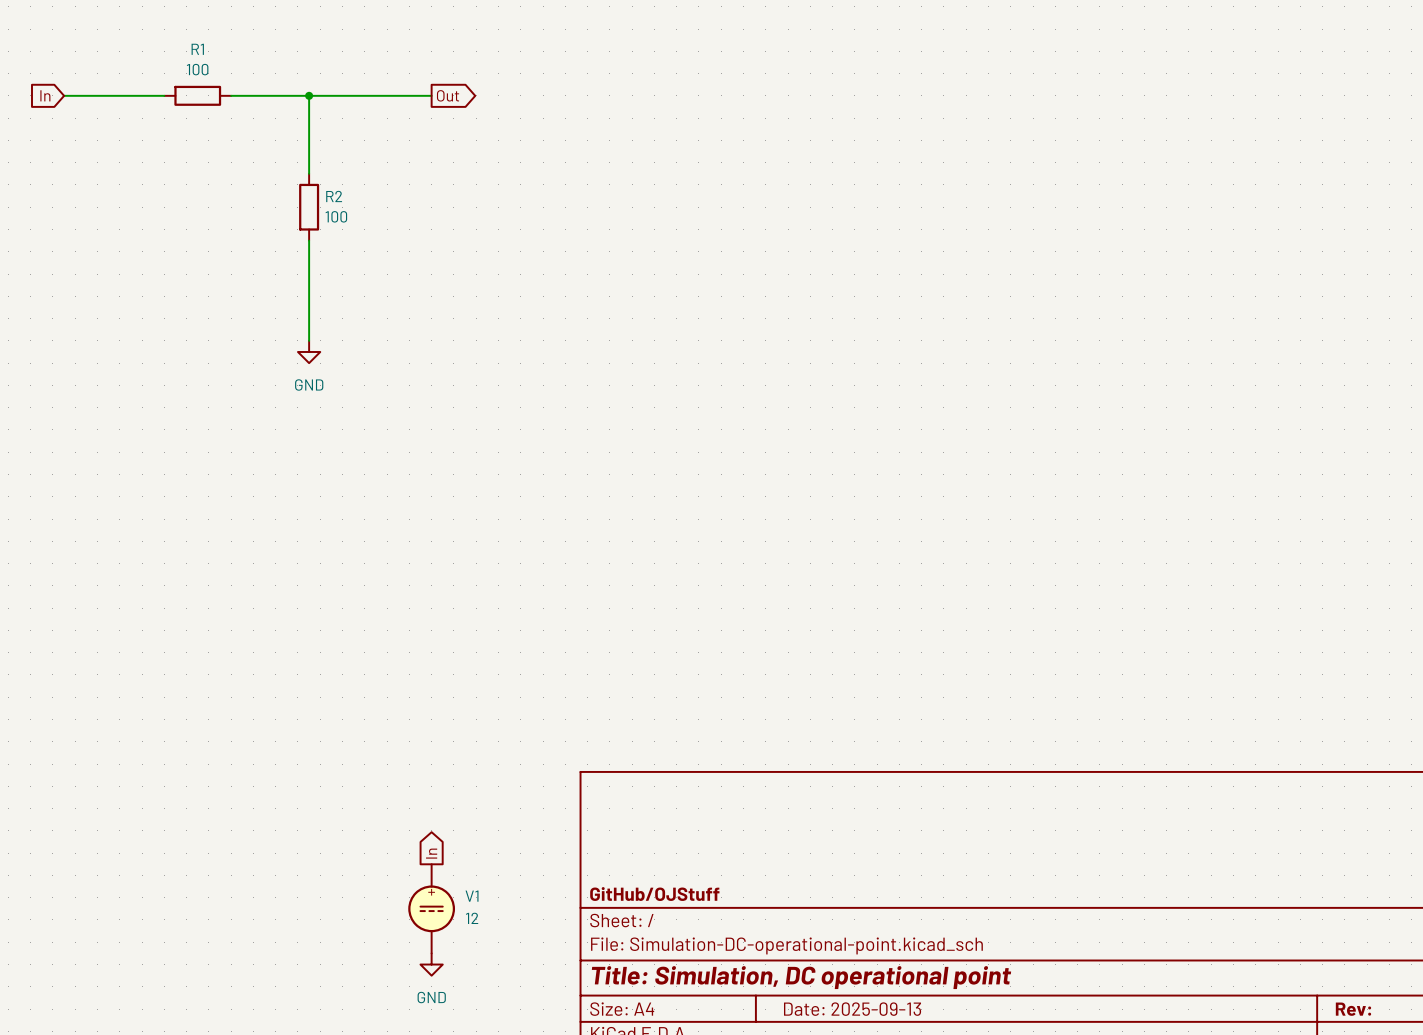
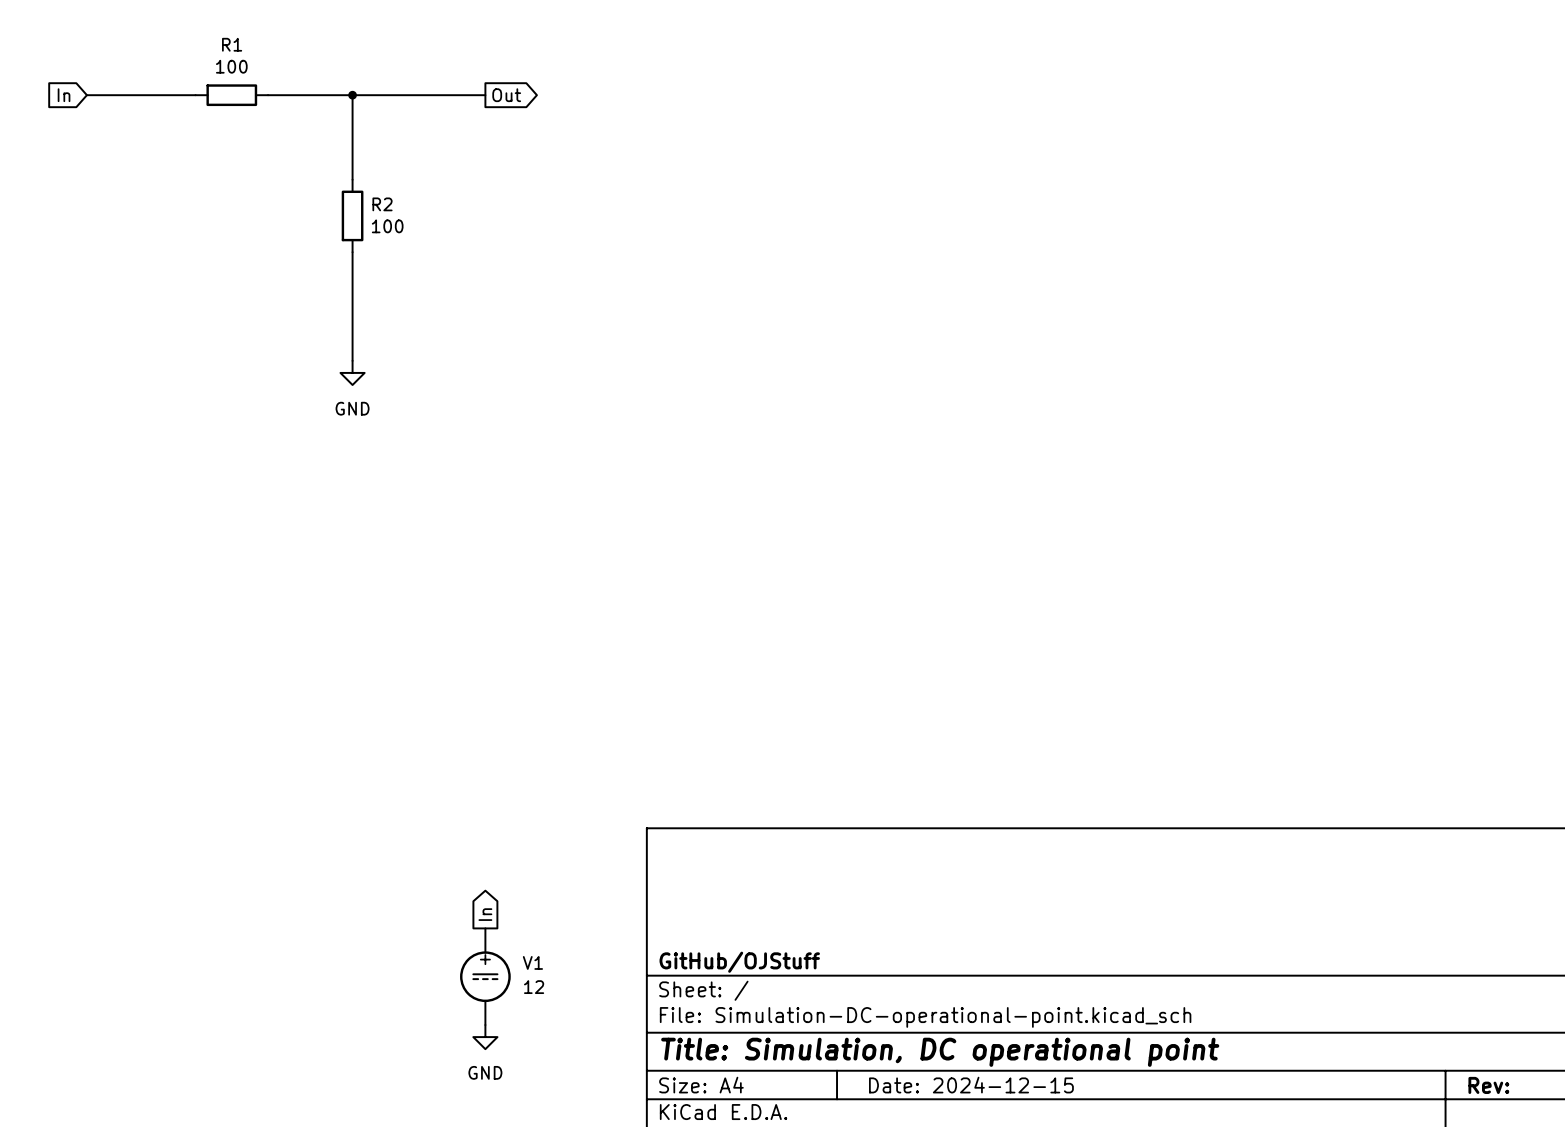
title block: Date: 2025-09-13 (852, 1009) -> Date: 2024-12-15 (971, 1085)

